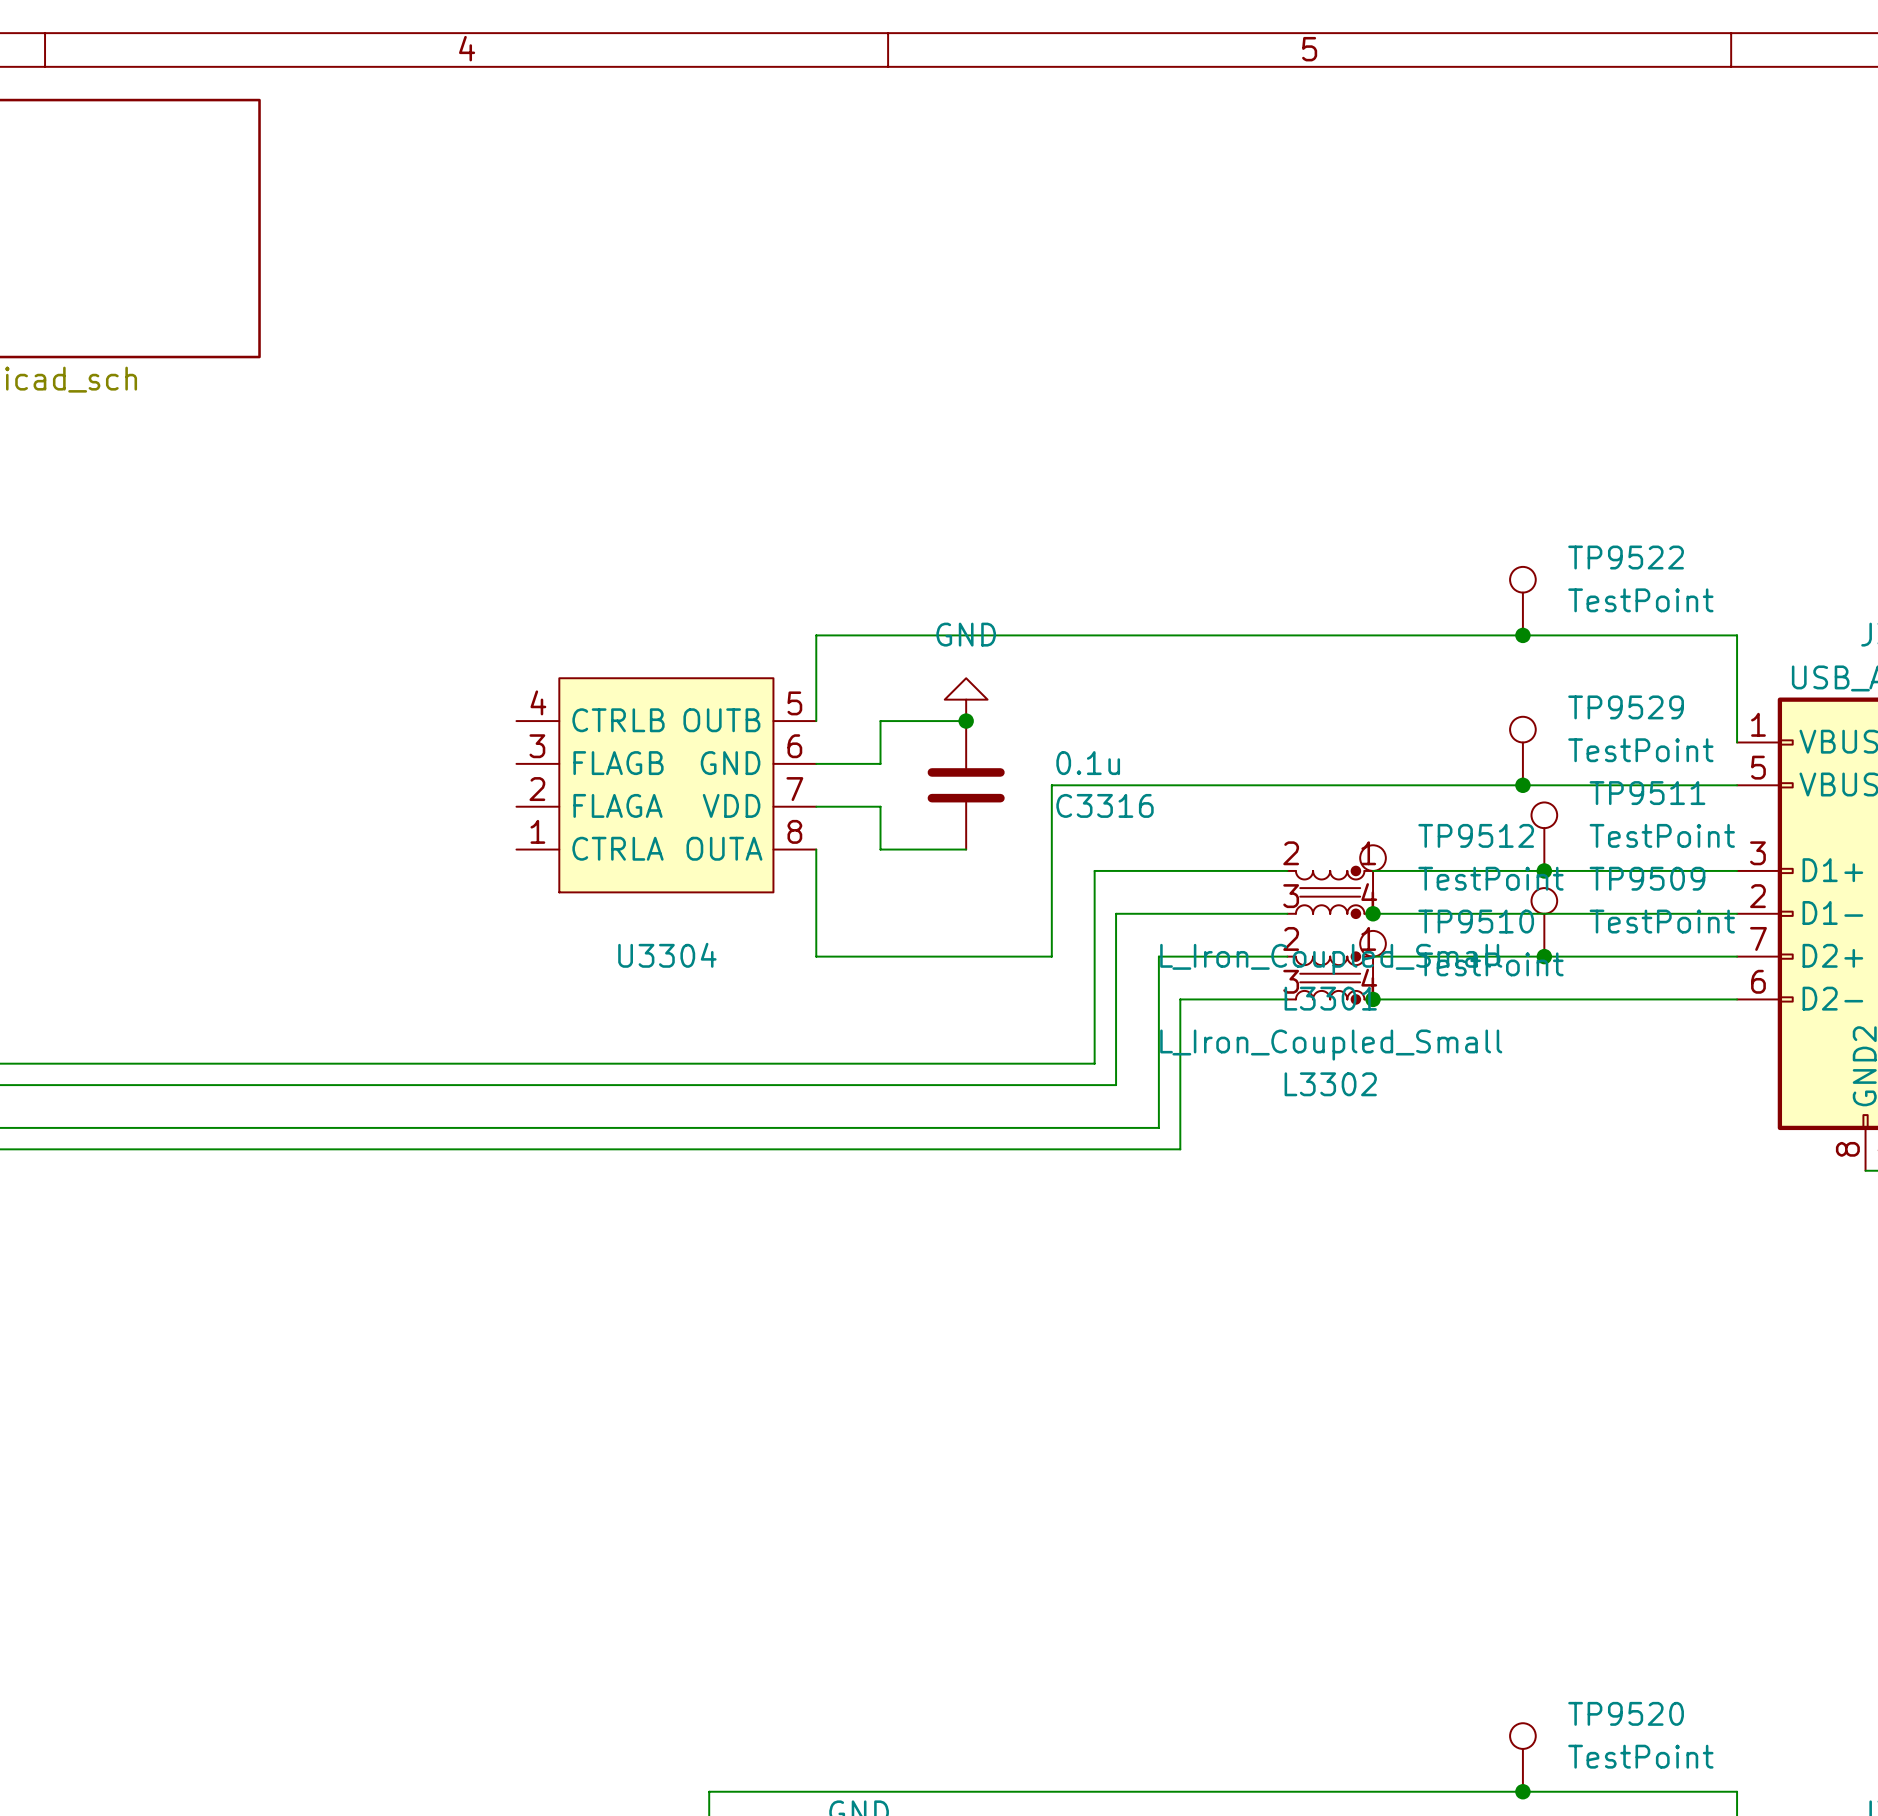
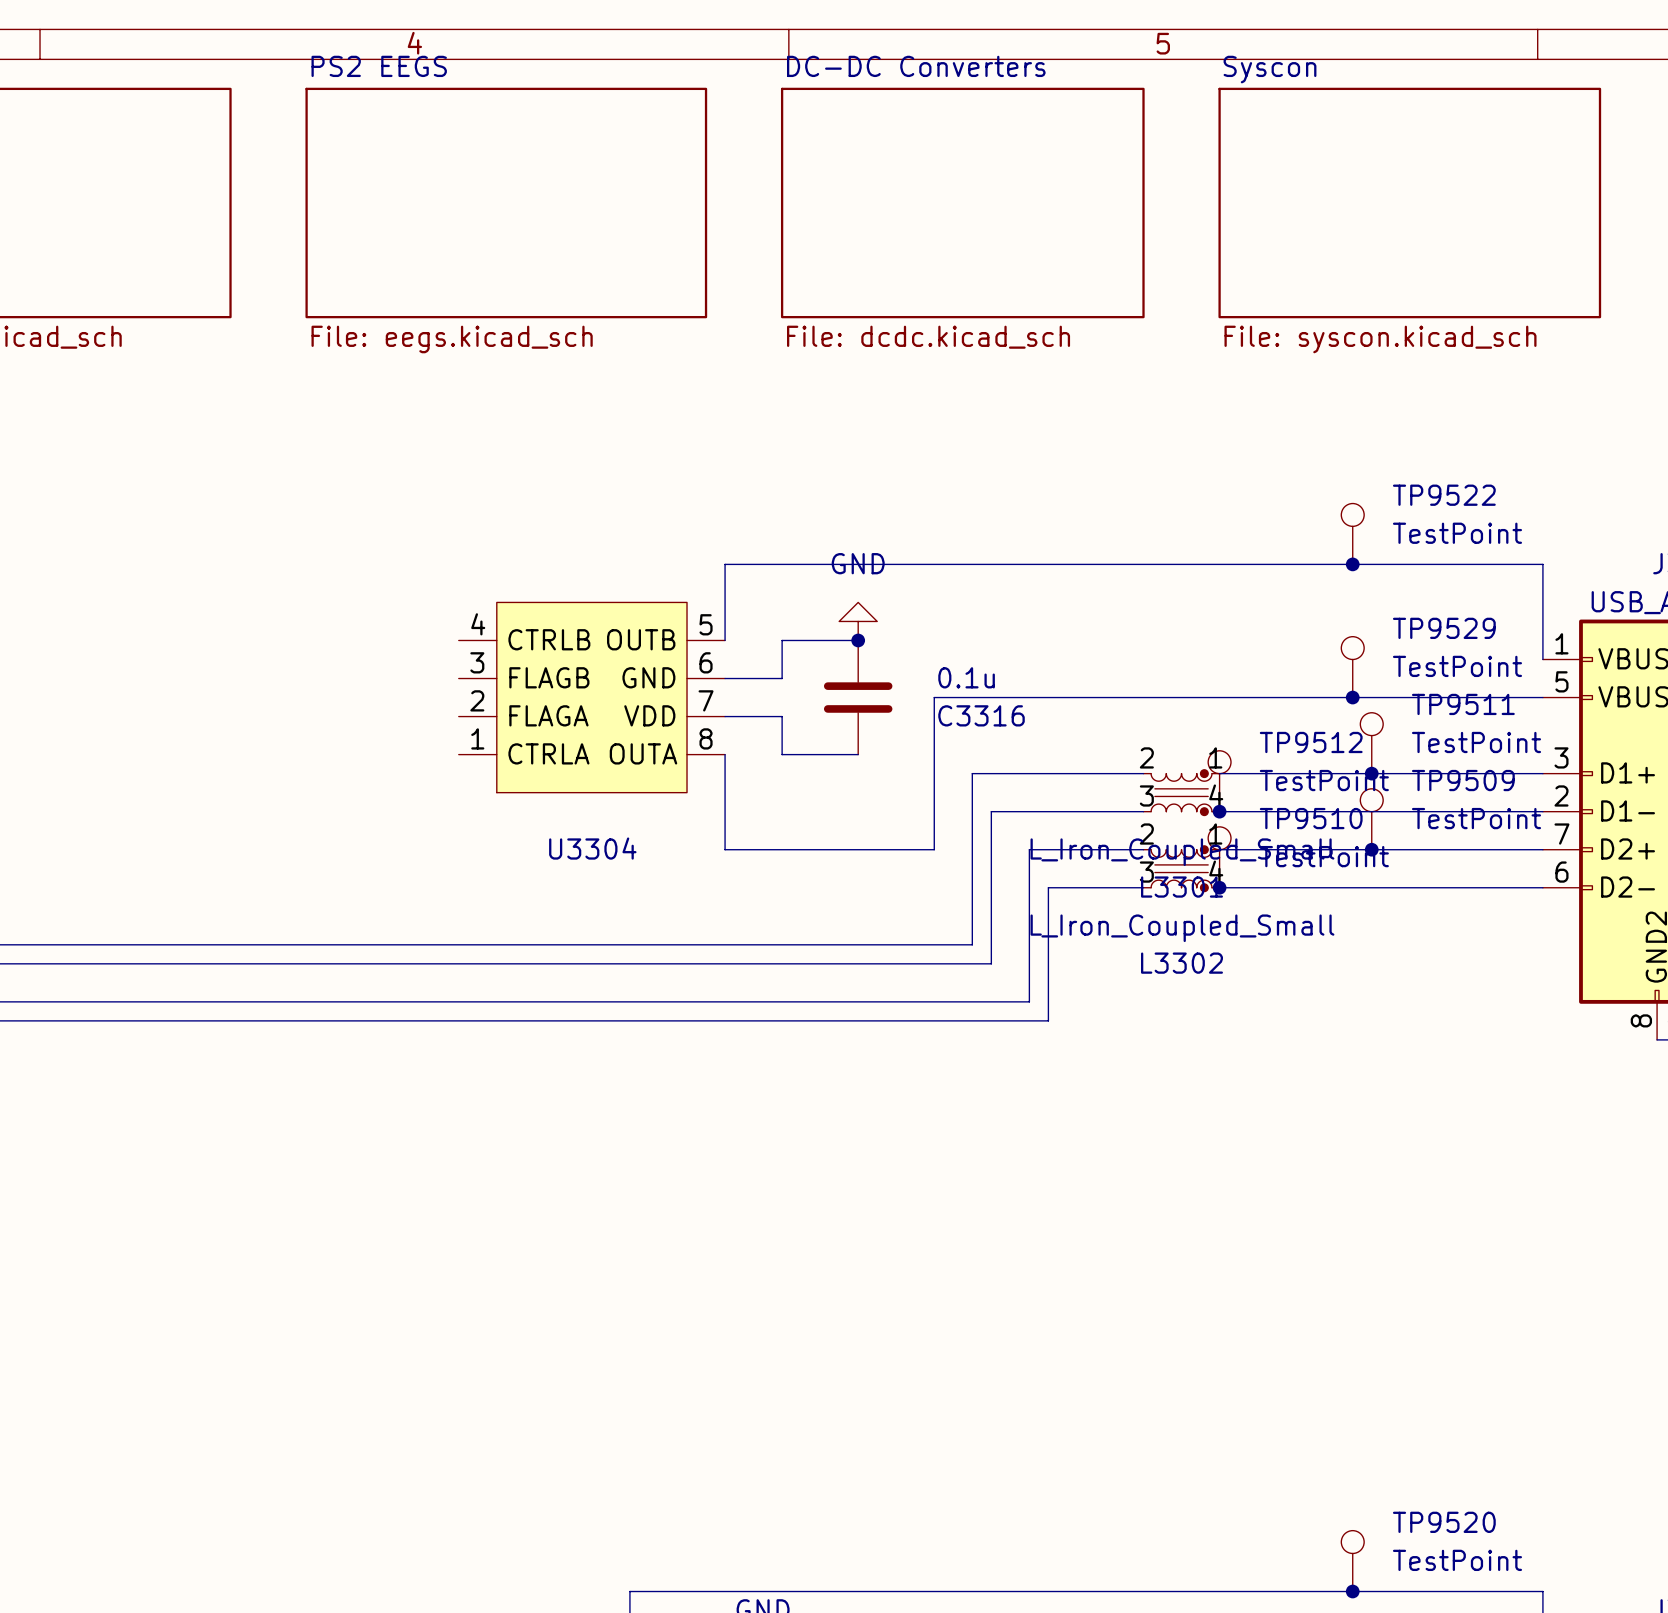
sheet PS2 EEGS: none -> File: eegs.kicad_sch (506, 203)
sheet DC-DC Converters: none -> File: dcdc.kicad_sch (962, 203)
sheet Syscon: none -> File: syscon.kicad_sch (1409, 203)

